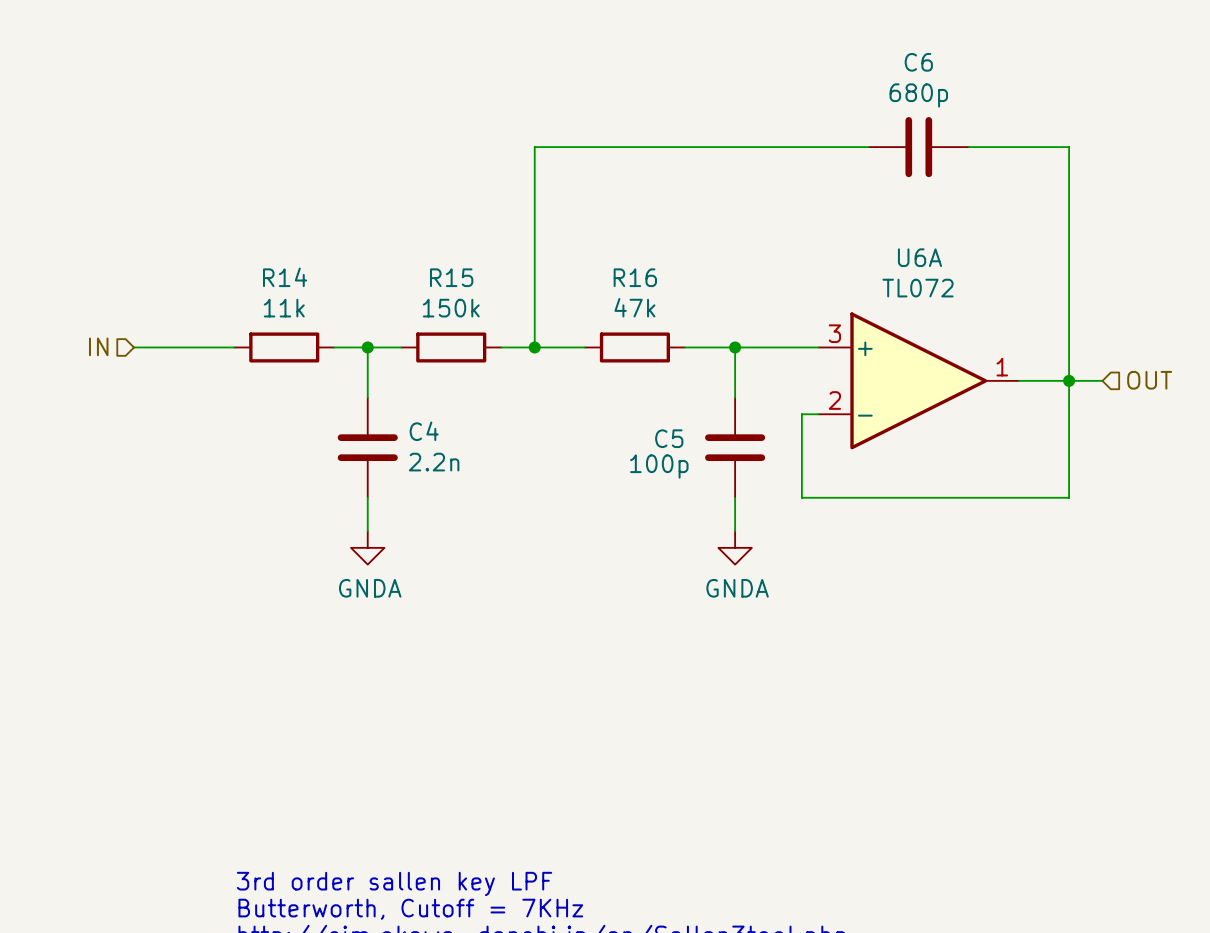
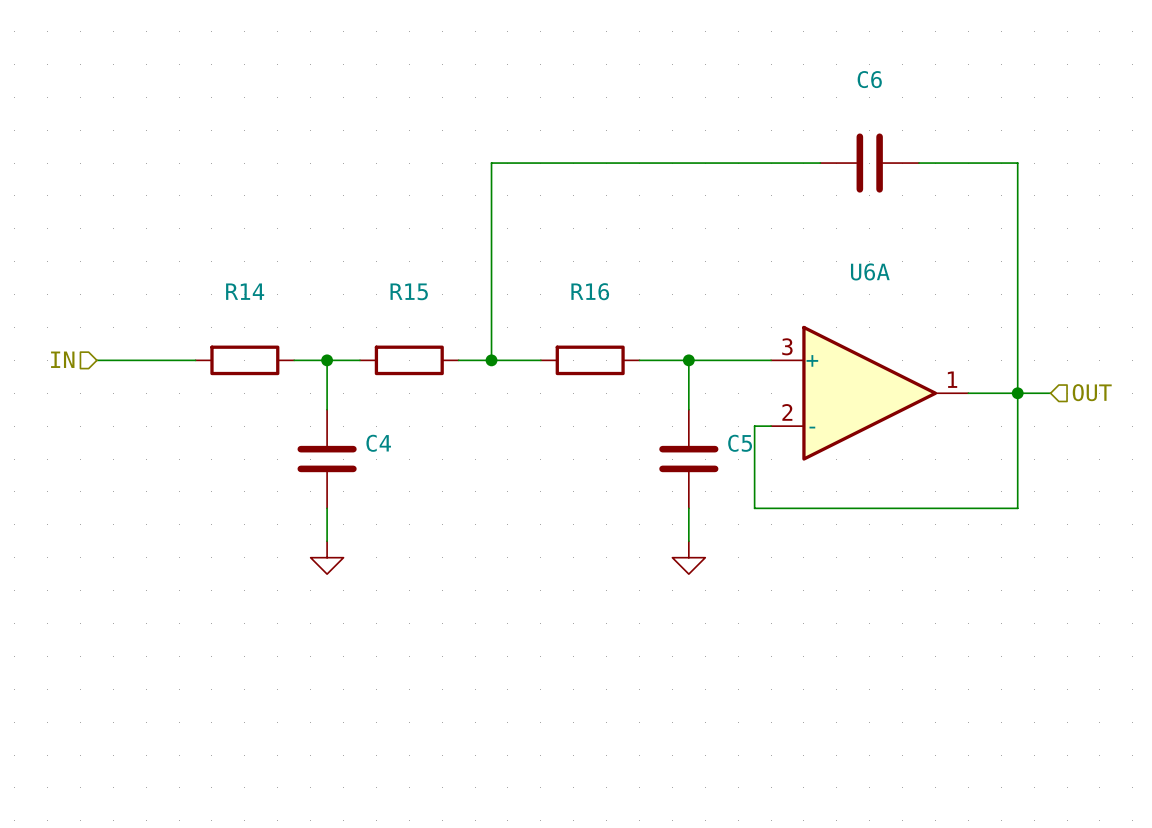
C6 value: 680p (918, 95) -> none
U6A value: TL072 (918, 288) -> none
R16 value: 47k (634, 307) -> none
R14 value: 11k (284, 308) -> none
R15 value: 150k (451, 308) -> none
C5 name position: C5 (669, 438) -> C5 (740, 443)
C4 value: 2.2n (434, 462) -> none
C5 value: 100p (659, 466) -> none
power symbol text: GNDA (370, 588) -> none
power symbol text: GNDA (737, 588) -> none

